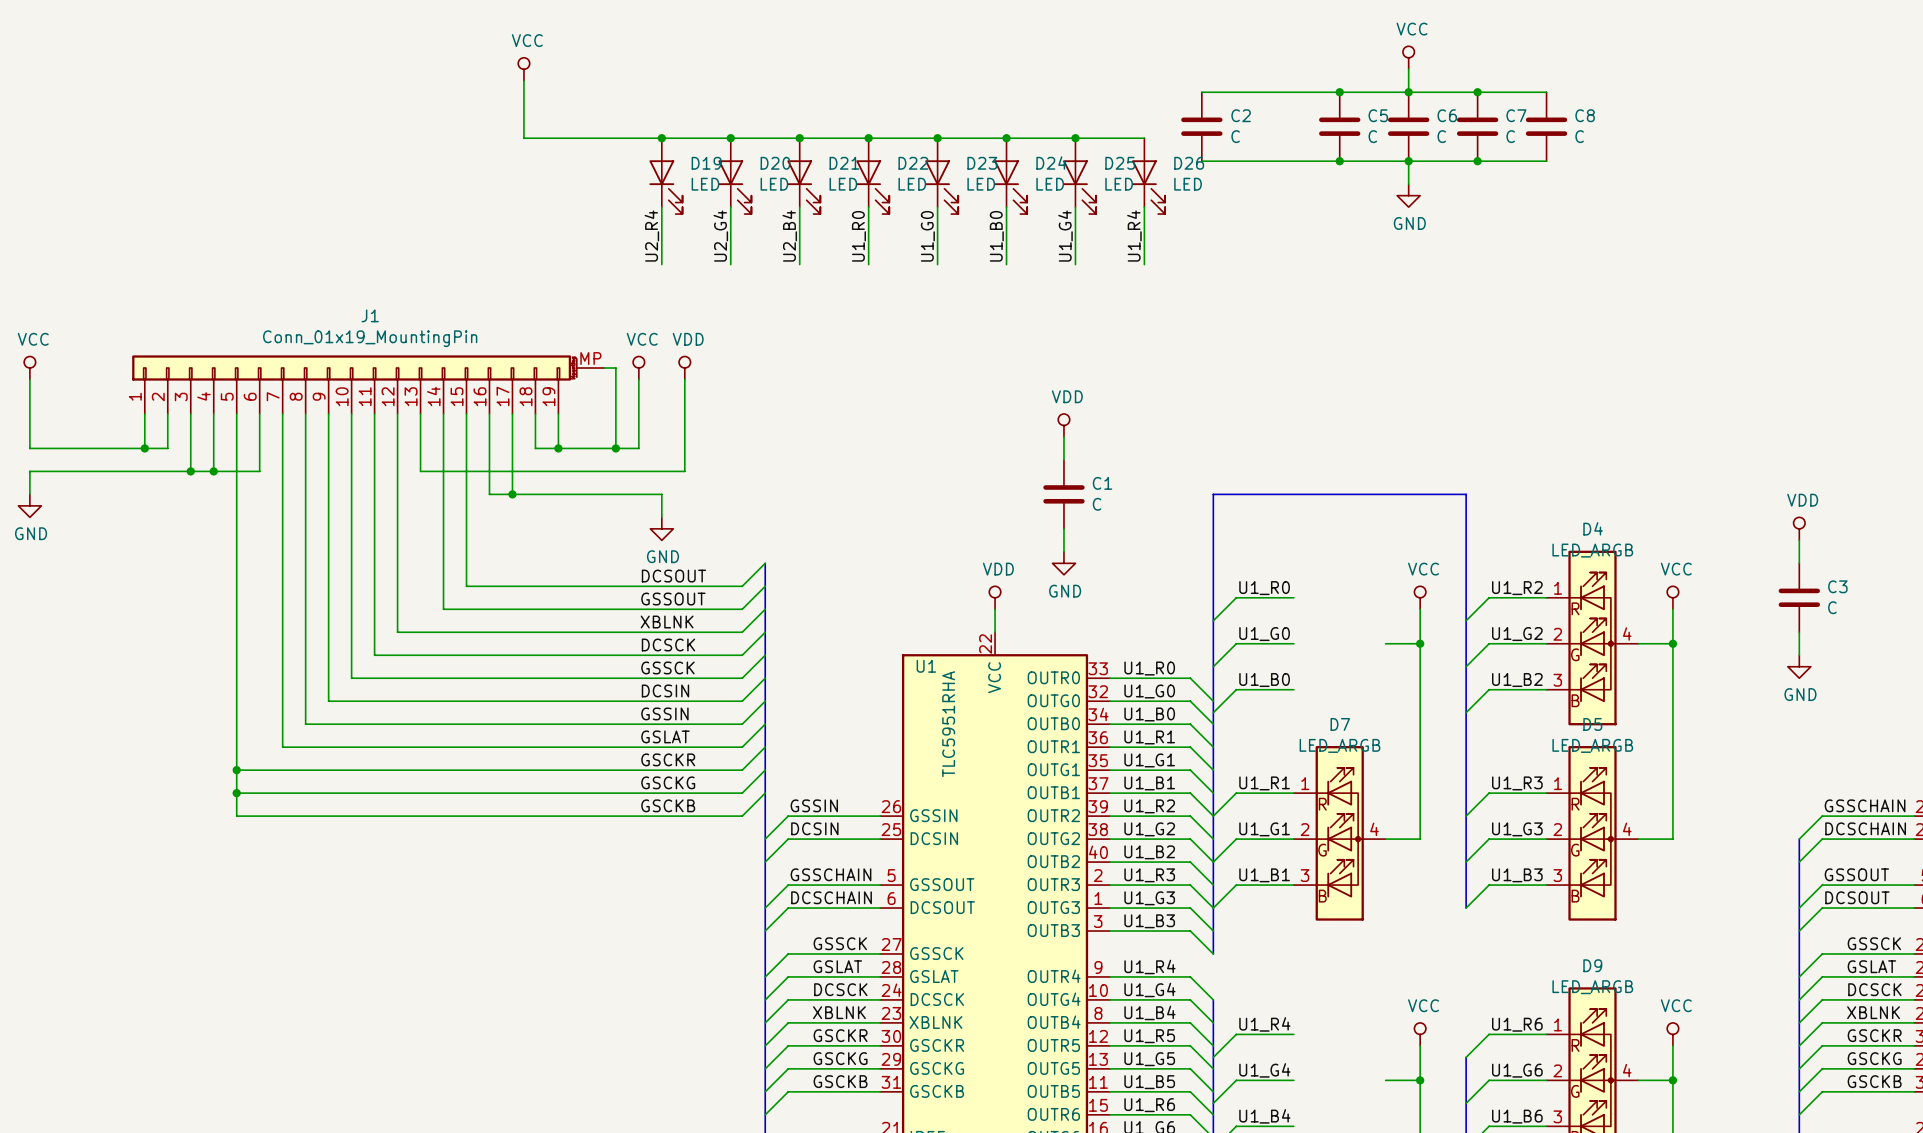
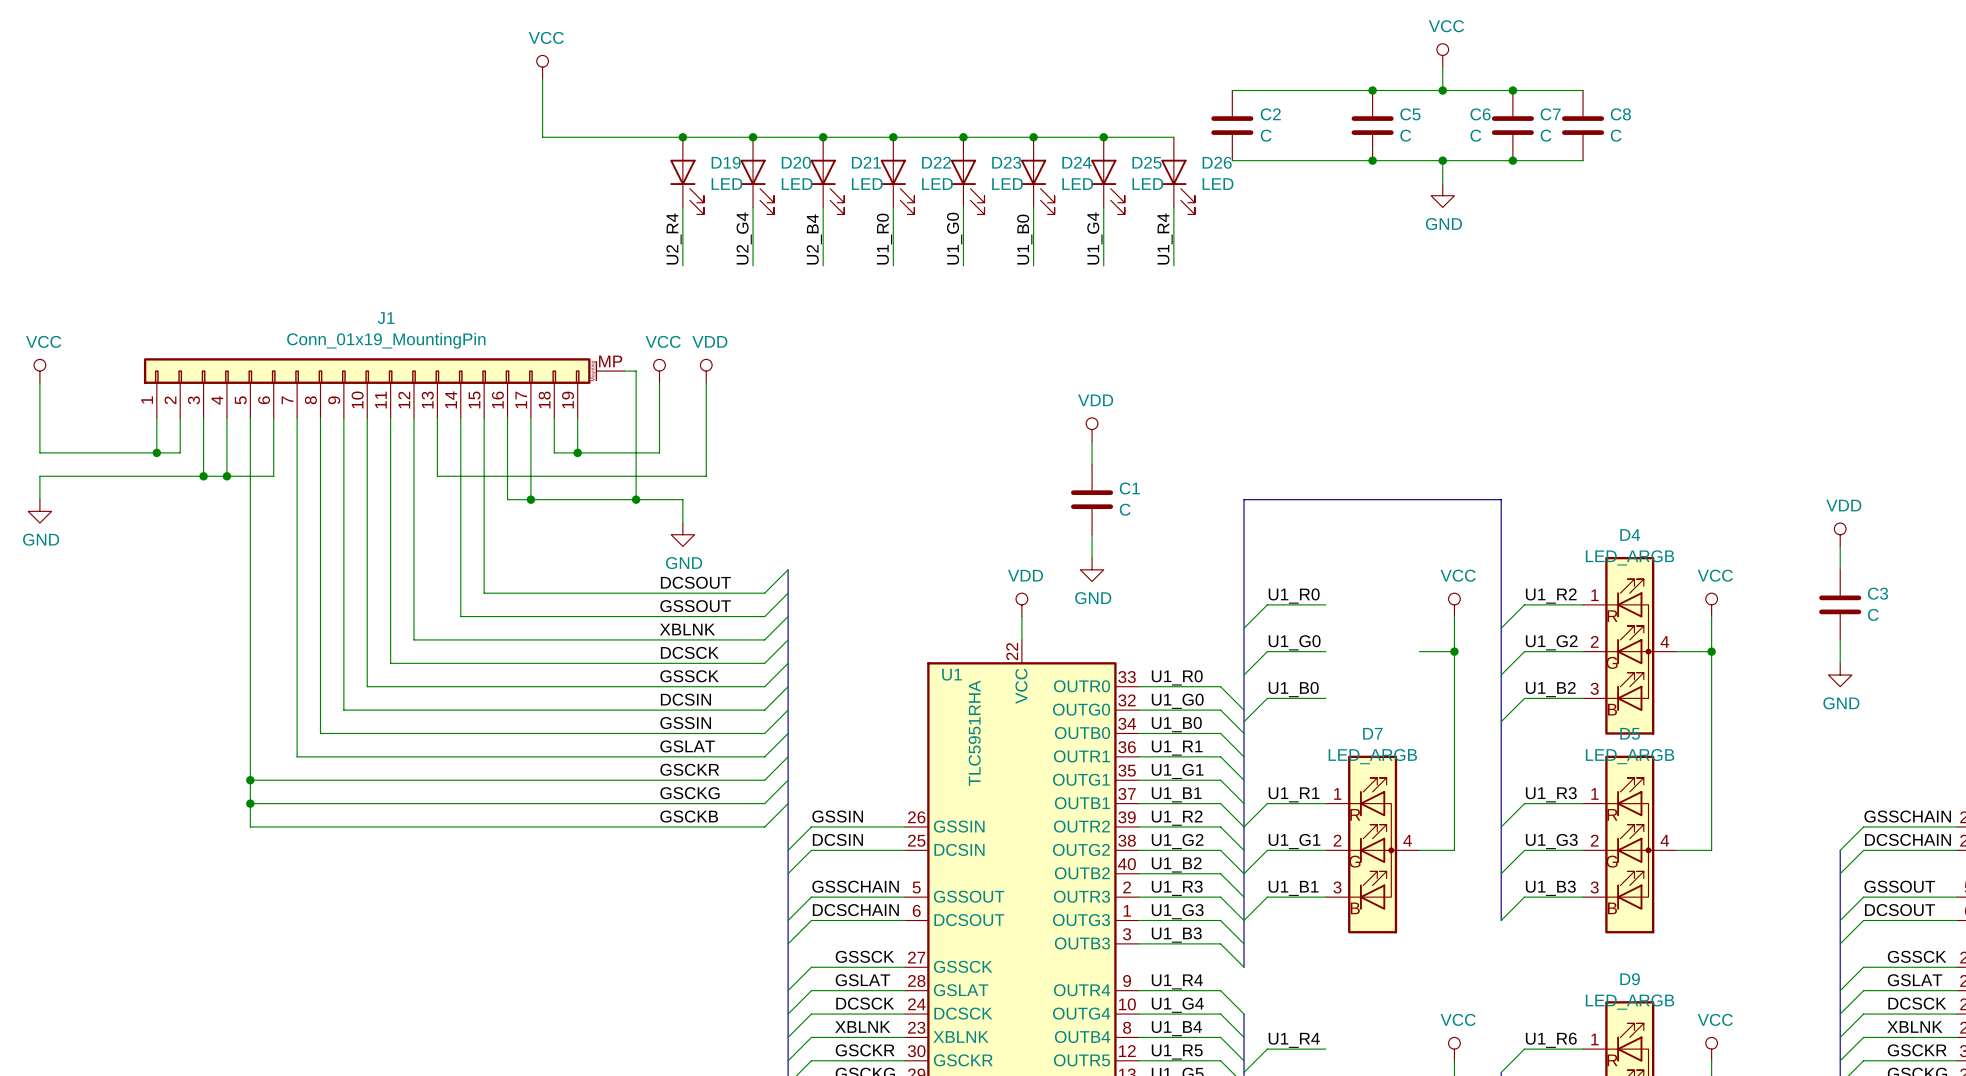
C6 symbol: [1387, 92, 1430, 162] -> [1470, 108, 1491, 142]
wire: none -> (636, 452) (636, 499)
junction position: (615, 448) -> (636, 499)

